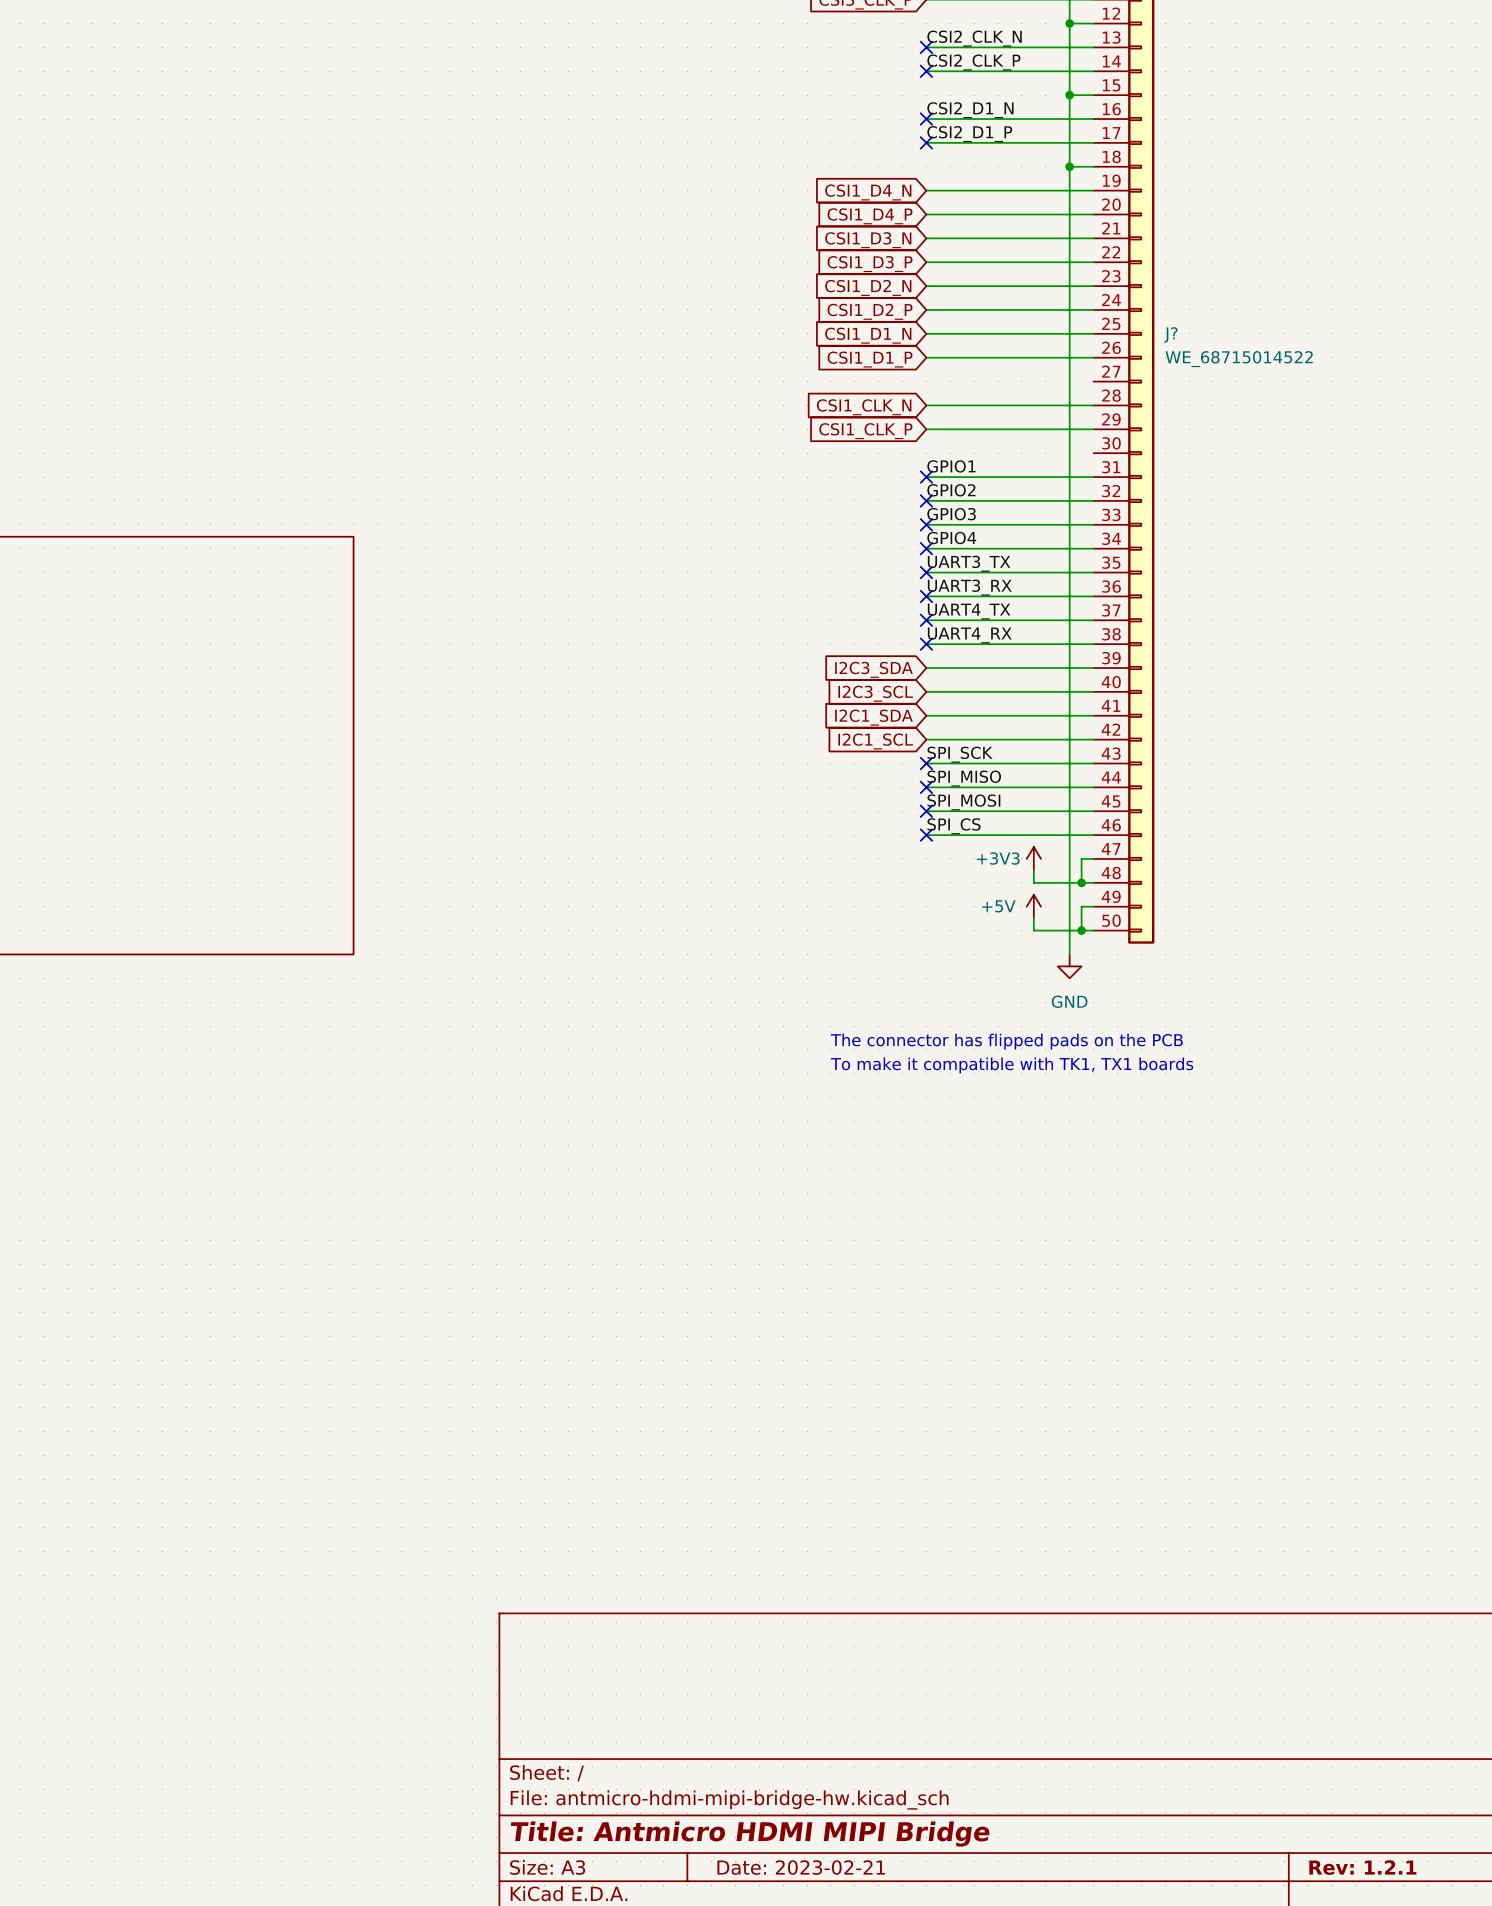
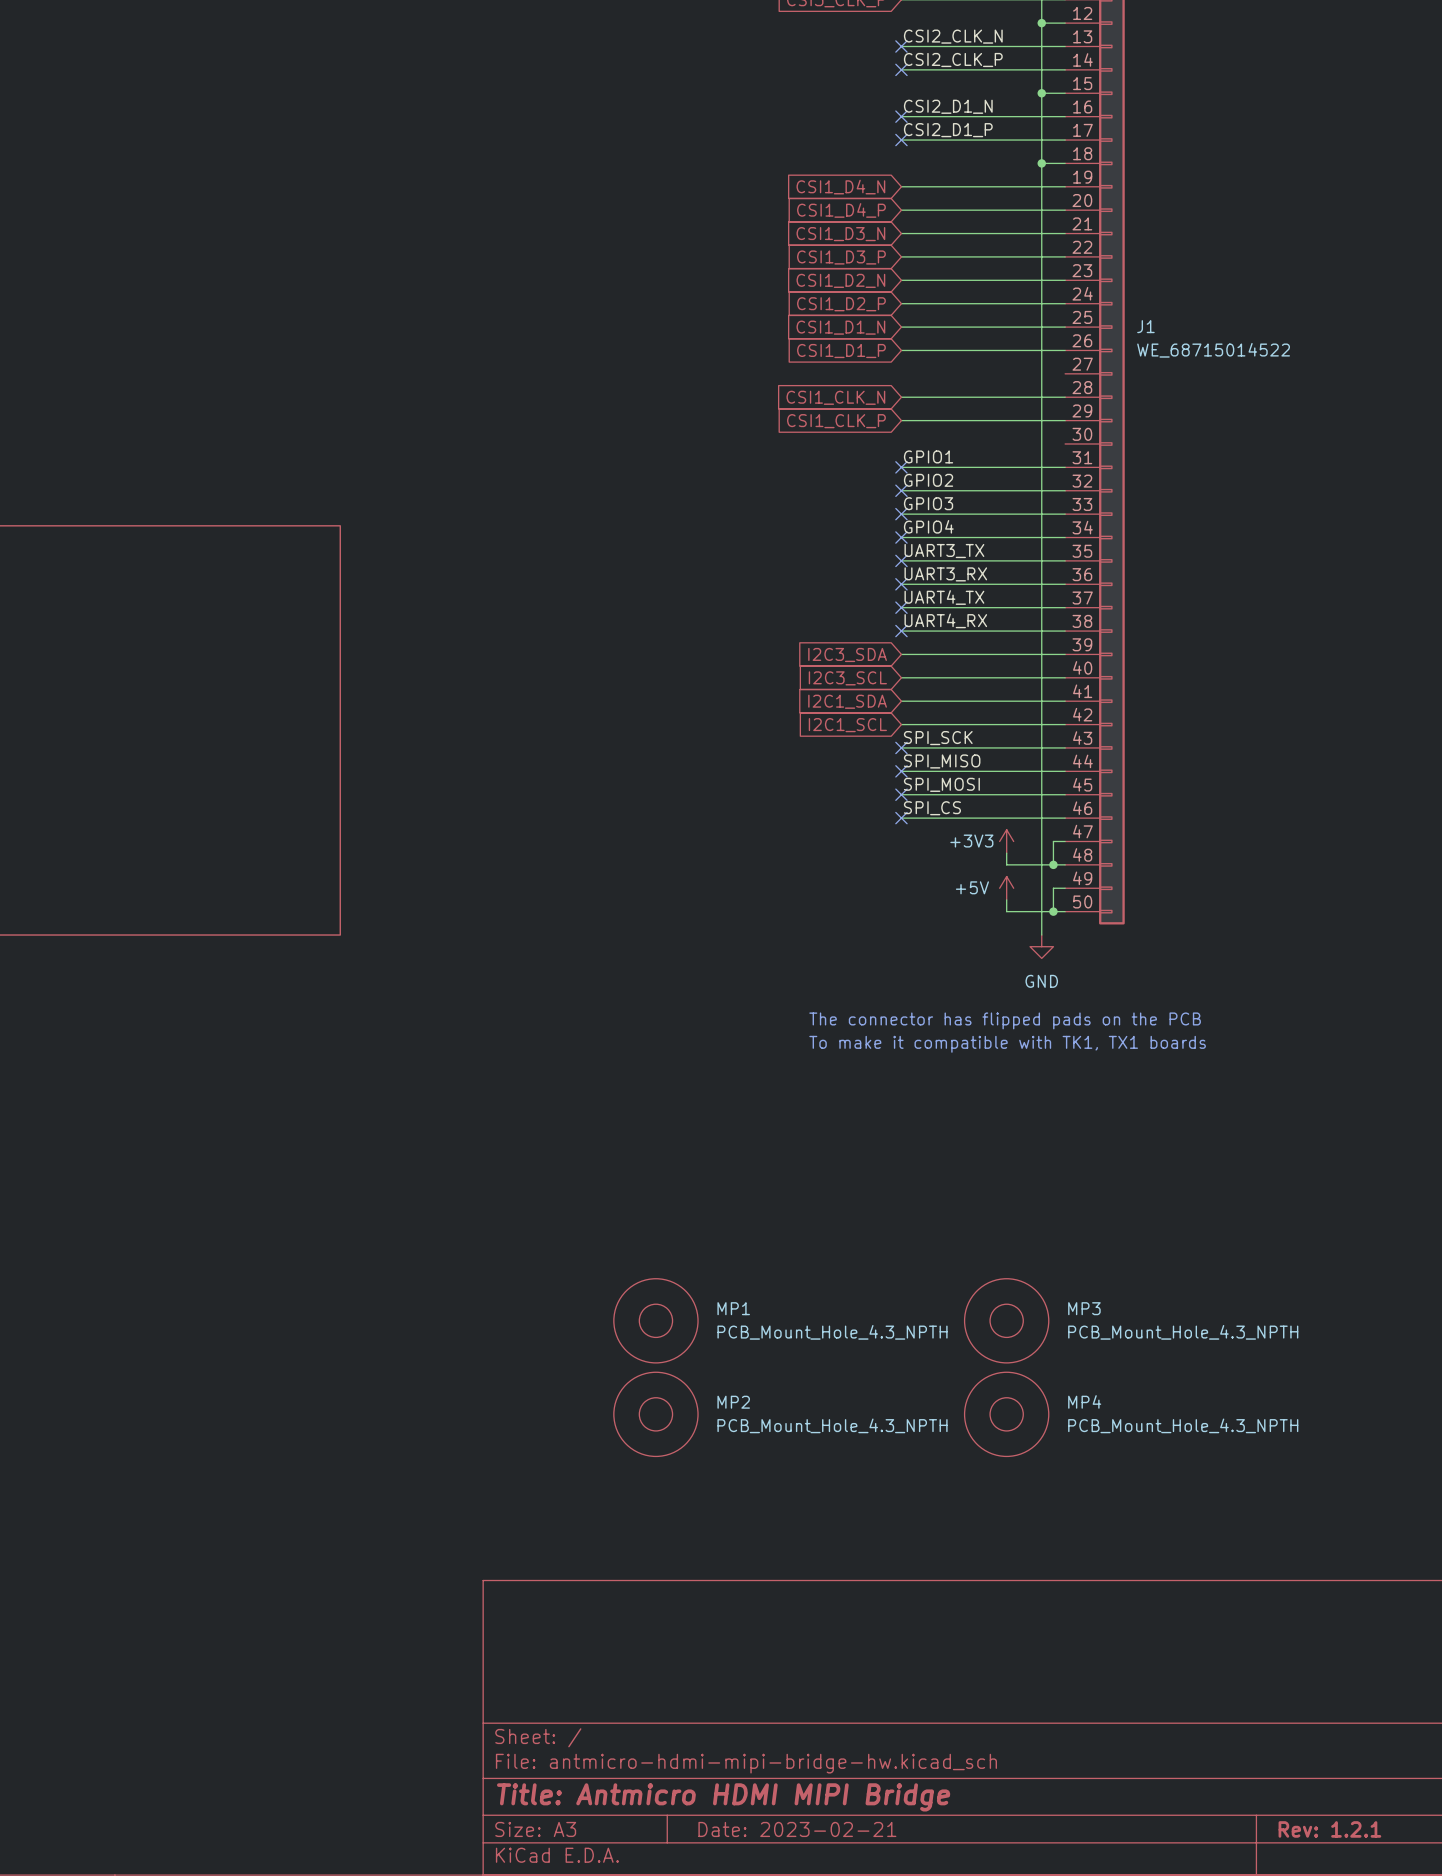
J? name: J? (1170, 334) -> J1 (1145, 326)
MP1: none -> PCB_Mount_Hole_4.3_NPTH (655, 1320)
MP3: none -> PCB_Mount_Hole_4.3_NPTH (1006, 1320)
MP2: none -> PCB_Mount_Hole_4.3_NPTH (655, 1414)
MP4: none -> PCB_Mount_Hole_4.3_NPTH (1006, 1414)

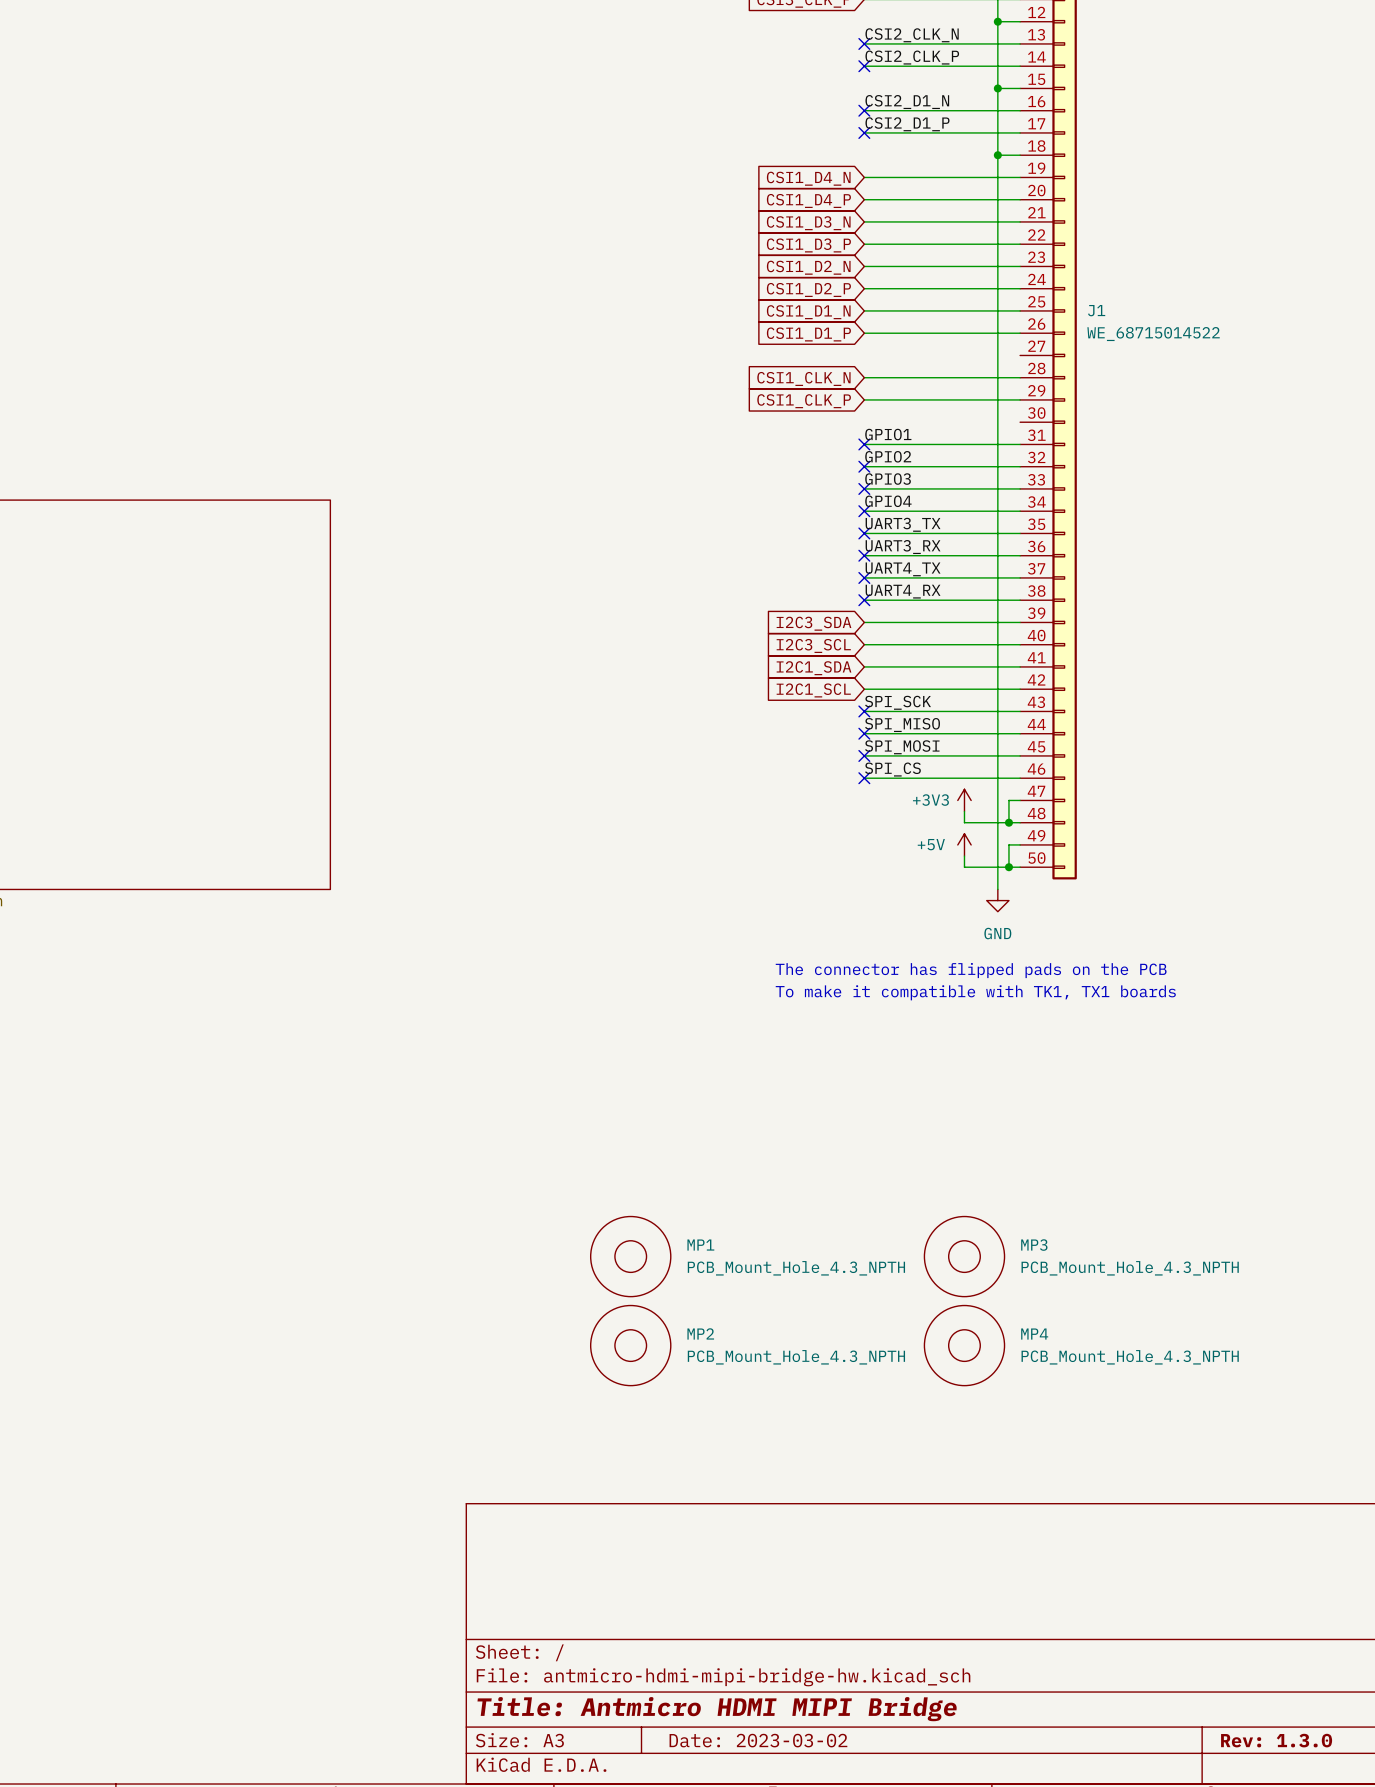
title block: Date: 2023-02-21 (797, 1829) -> Date: 2023-03-02 (758, 1740)
title block: Rev: 1.2.1 (1329, 1829) -> Rev: 1.3.0 (1276, 1740)

